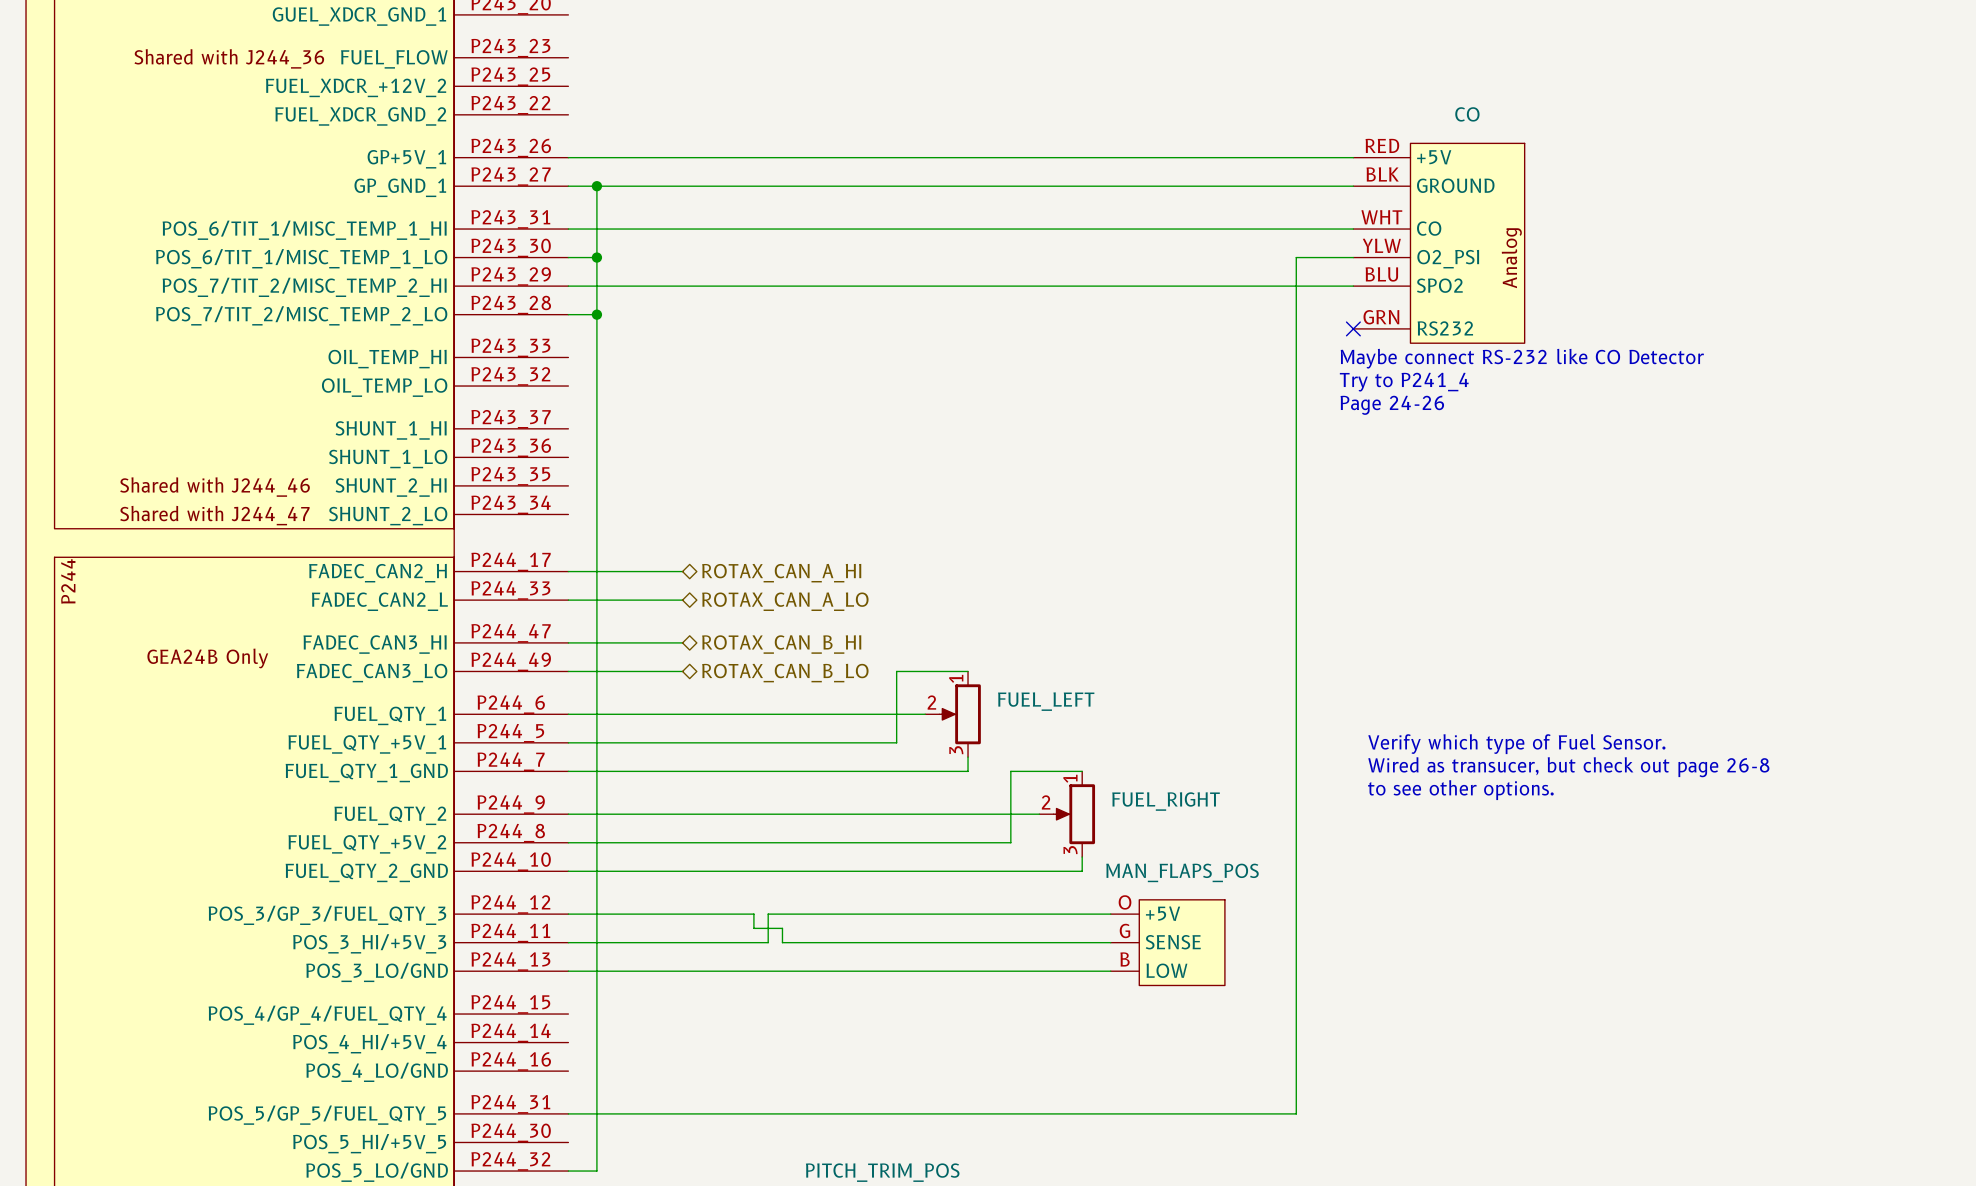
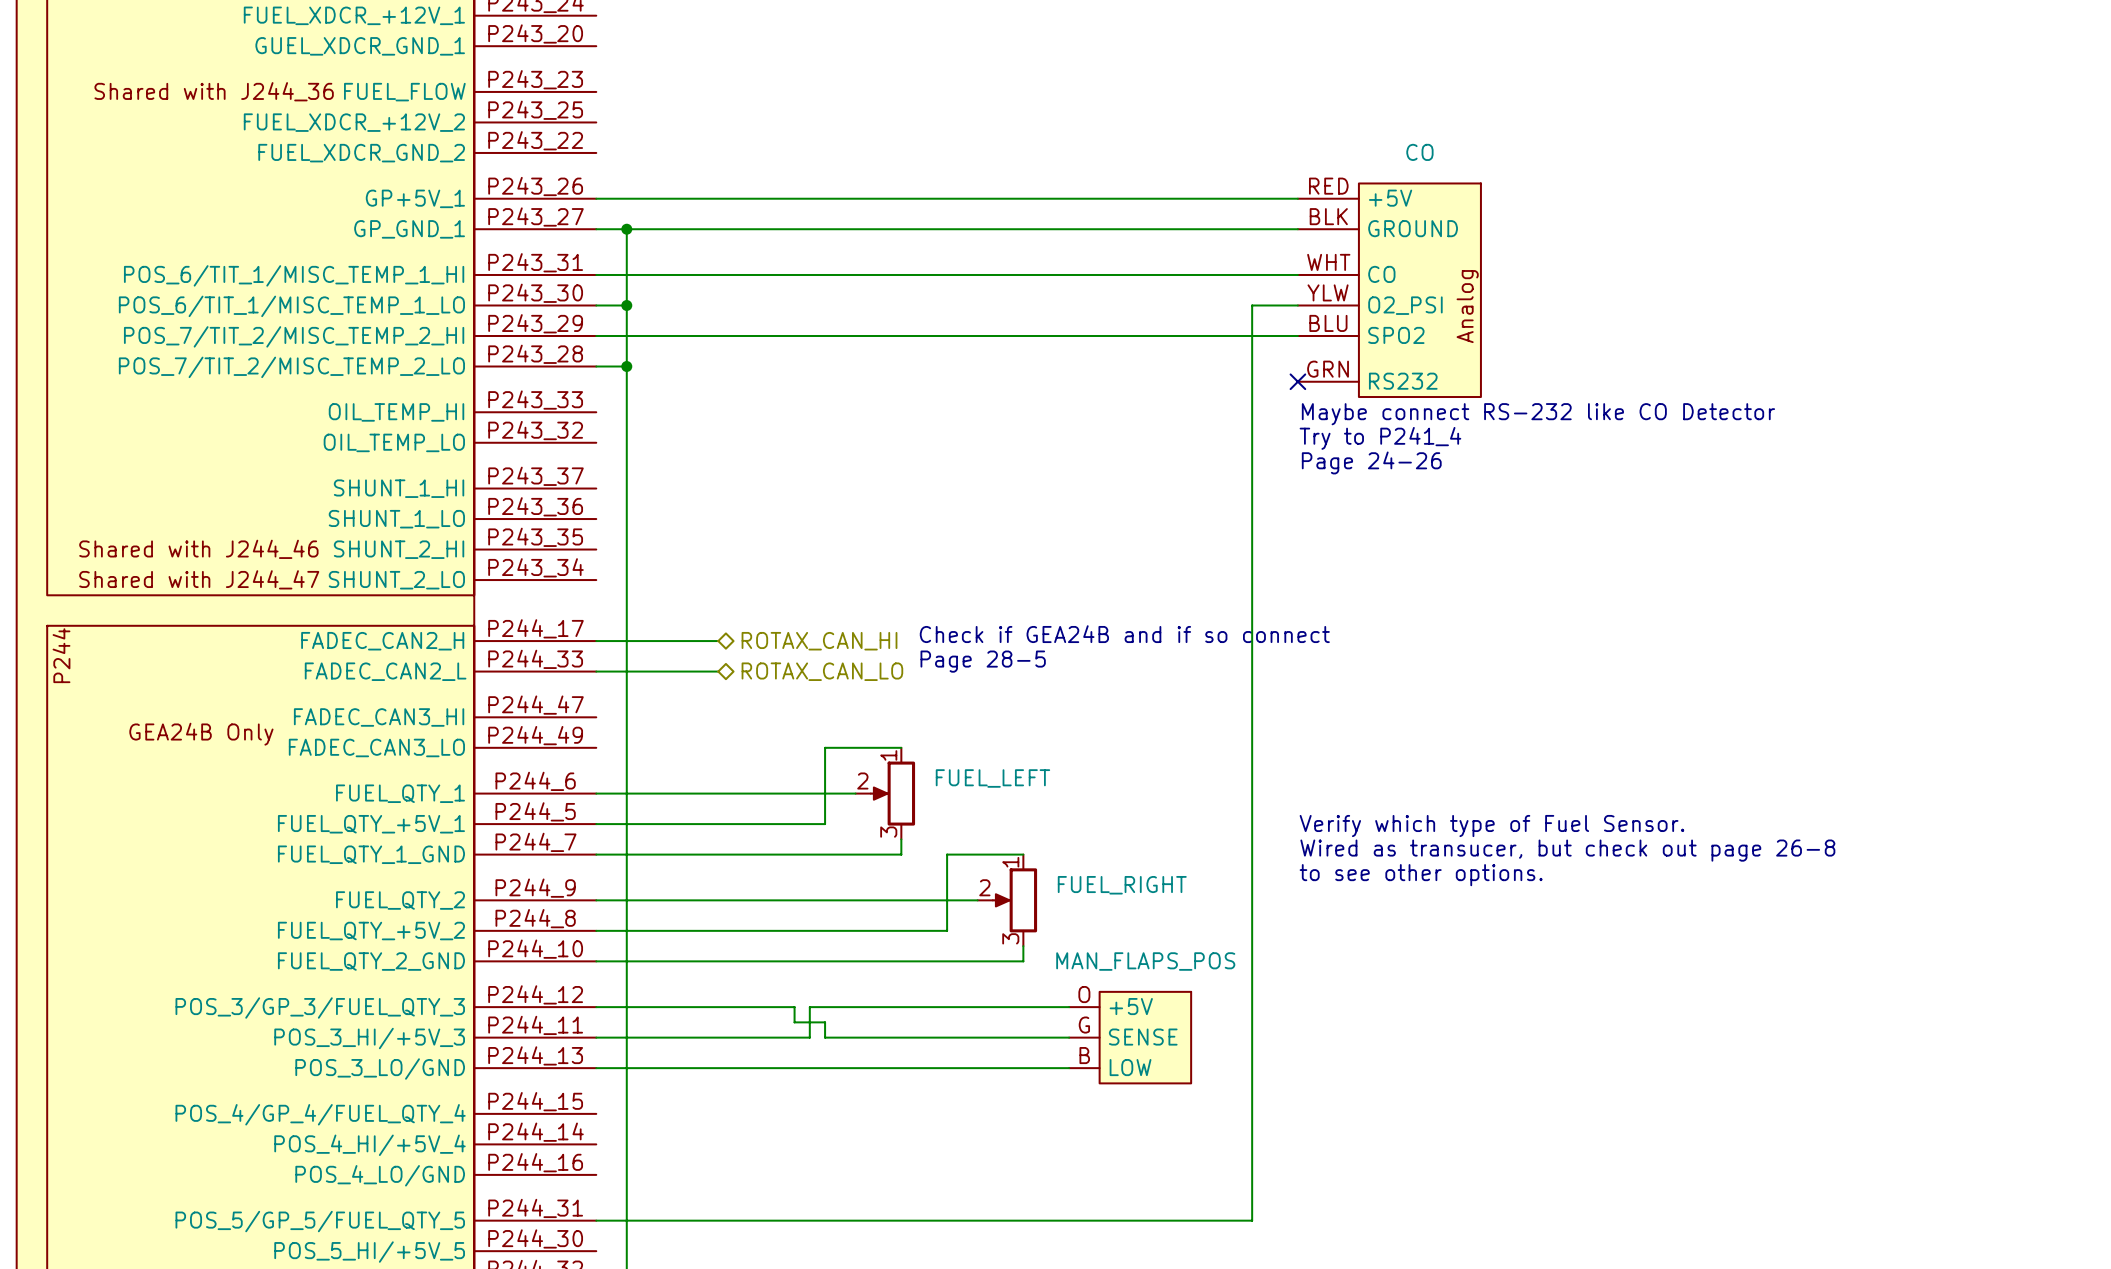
CO position: (1439, 243) -> (1389, 290)
wire: (1353, 257) (1296, 257) (1296, 1113) (1182, 1113) -> (1297, 305) (1252, 305) (1252, 1220)
no-connect mark: none -> (1297, 381)
no-connect mark: (1353, 328) -> none
text position: Maybe connect RS-232 like CO Detector (1522, 358) -> Maybe connect RS-232 like CO Detector (1538, 414)
text position: Try to P241_4 (1404, 382) -> Try to P241_4 (1380, 438)
text position: Page 24-26 (1392, 405) -> Page 24-26 (1371, 462)
text: none -> Check if GEA24B and if so connect (1124, 634)
hierarchical label: ROTAX_CAN_A_HI (781, 573) -> ROTAX_CAN_HI (819, 641)
text: none -> Page 28-5 (983, 661)
hierarchical label: ROTAX_CAN_A_LO (785, 601) -> ROTAX_CAN_LO (822, 671)
wire: (568, 642) (682, 642) -> none
hierarchical label: ROTAX_CAN_B_HI (781, 644) -> none
wire: (568, 671) (682, 671) -> none
wire: (968, 671) (896, 671) (896, 742) (782, 742) -> (901, 747) (825, 747) (825, 824)
hierarchical label: ROTAX_CAN_B_LO (785, 673) -> none
wire: (811, 714) (925, 714) -> none
FUEL_LEFT position: (953, 714) -> (885, 793)
text position: Verify which type of Fuel Sensor. (1516, 744) -> Verify which type of Fuel Sensor. (1491, 826)
wire: (968, 757) (968, 771) -> none
text position: Wired as transucer, but check out page 26-8 (1568, 767) -> Wired as transucer, but check out page 26-8 (1567, 850)
wire: (853, 771) (896, 771) -> (901, 854) (901, 839)
wire: (1082, 771) (1010, 771) (1010, 842) (896, 842) -> (947, 854) (947, 930)
text position: to see other options. (1460, 790) -> to see other options. (1421, 875)
wire: (925, 814) (1039, 814) -> none
FUEL_RIGHT position: (1067, 814) -> (1007, 900)
wire: (1082, 857) (1082, 871) (968, 871) -> (1023, 946) (1023, 961)
MAN_FLAPS_POS position: (1167, 942) -> (1130, 1037)

